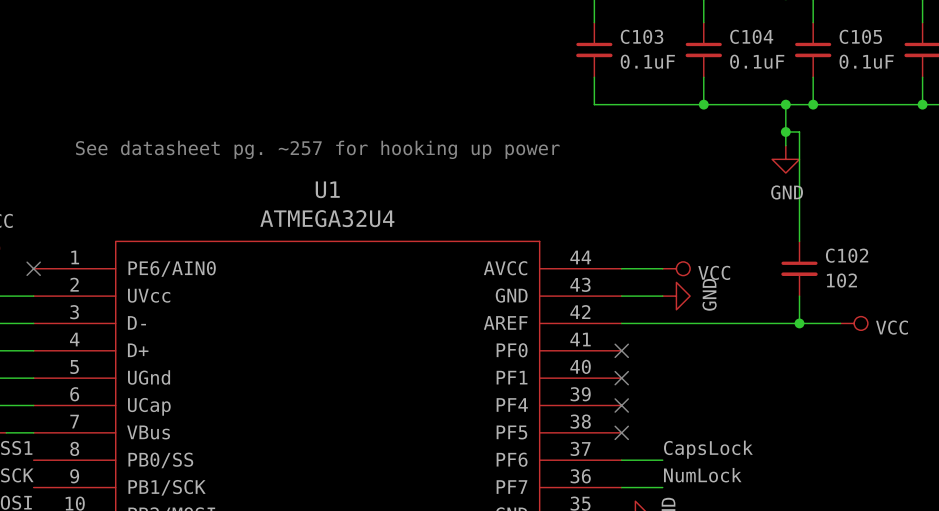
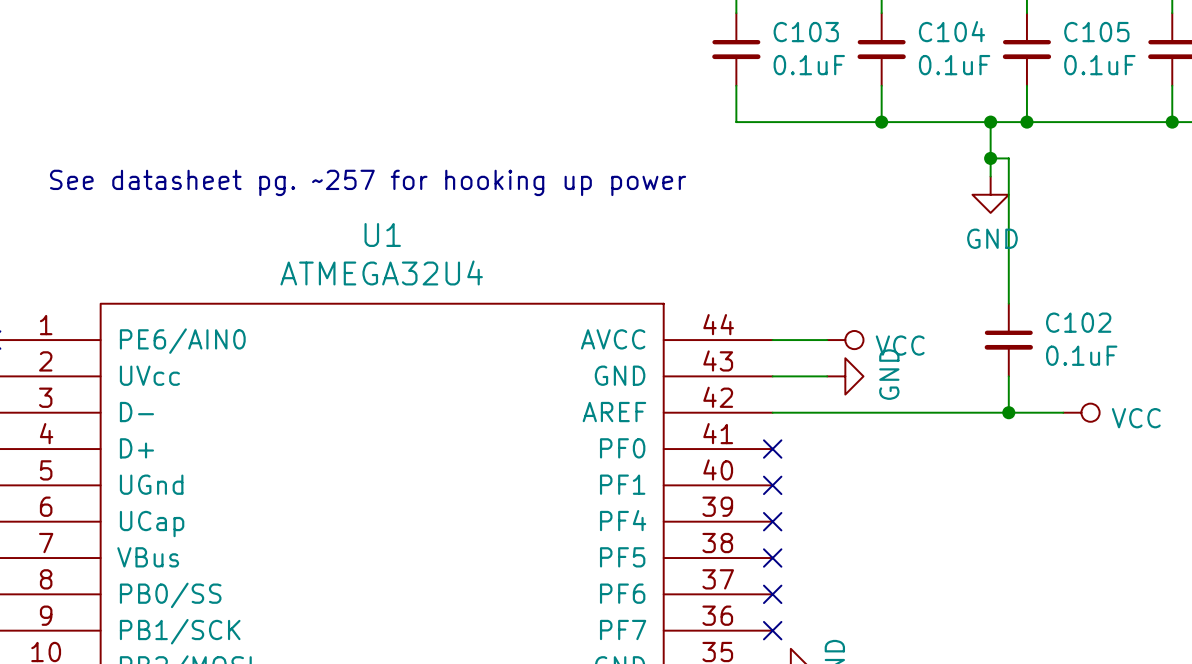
C102 value: 102 (841, 280) -> 0.1uF (1081, 355)
label: CapsLock (708, 449) -> none
wire: (621, 460) (662, 460) -> none
no-connect mark: none -> (772, 594)
label: NumLock (702, 475) -> none
wire: (621, 487) (662, 487) -> none
no-connect mark: none -> (772, 630)

